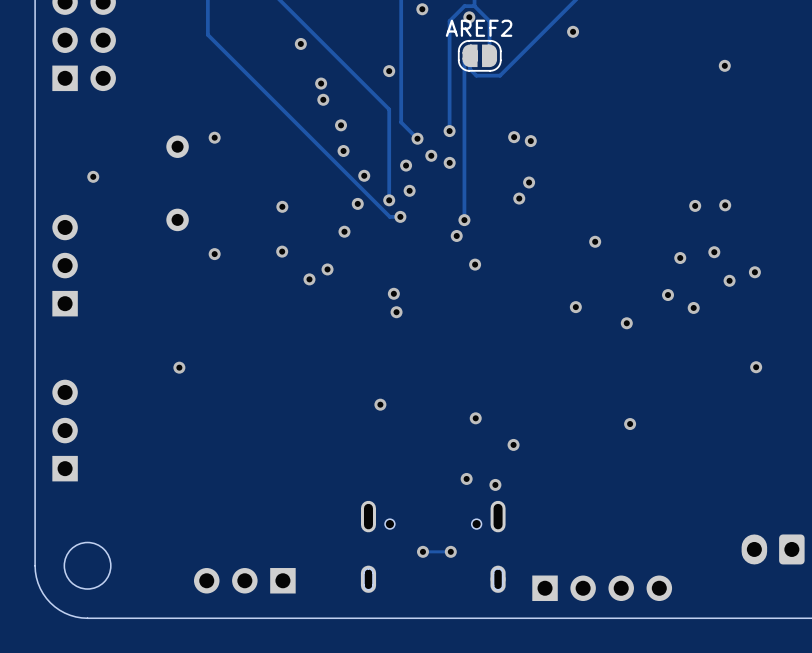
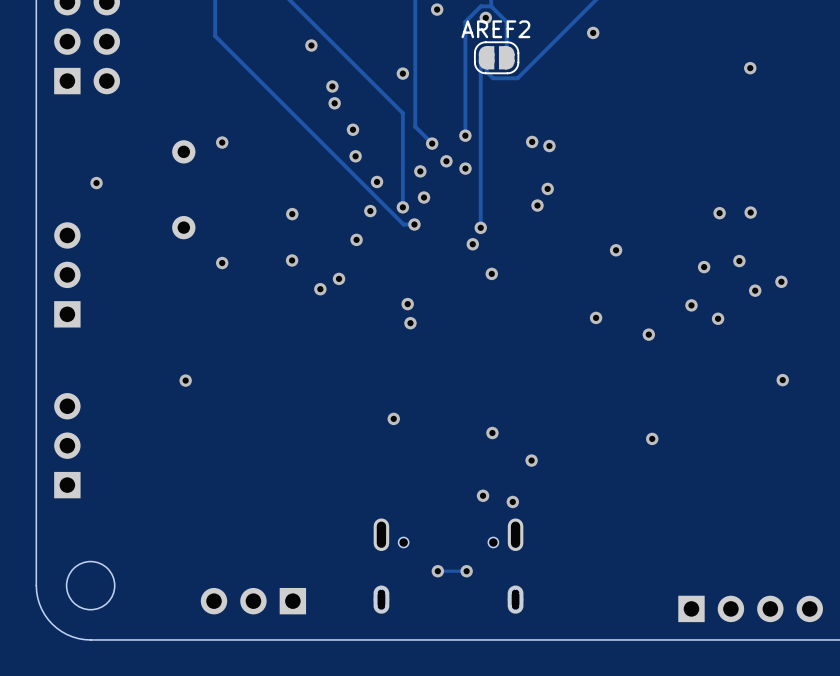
part: (773, 549) -> none
part position: (602, 588) -> (750, 608)

